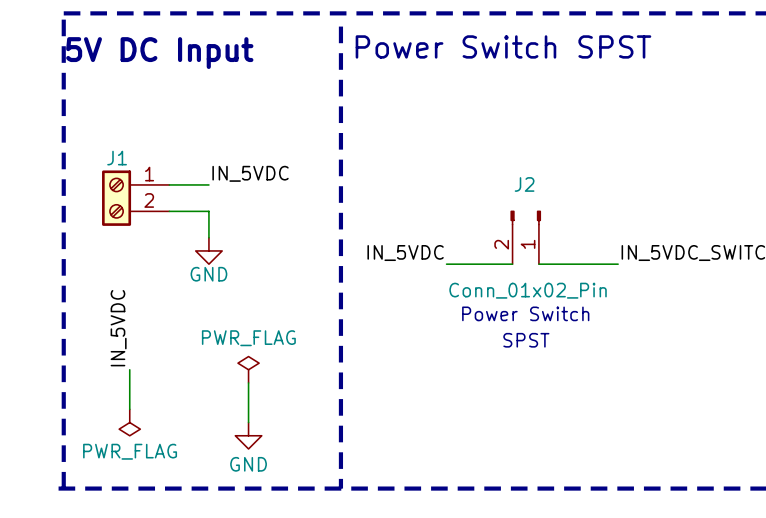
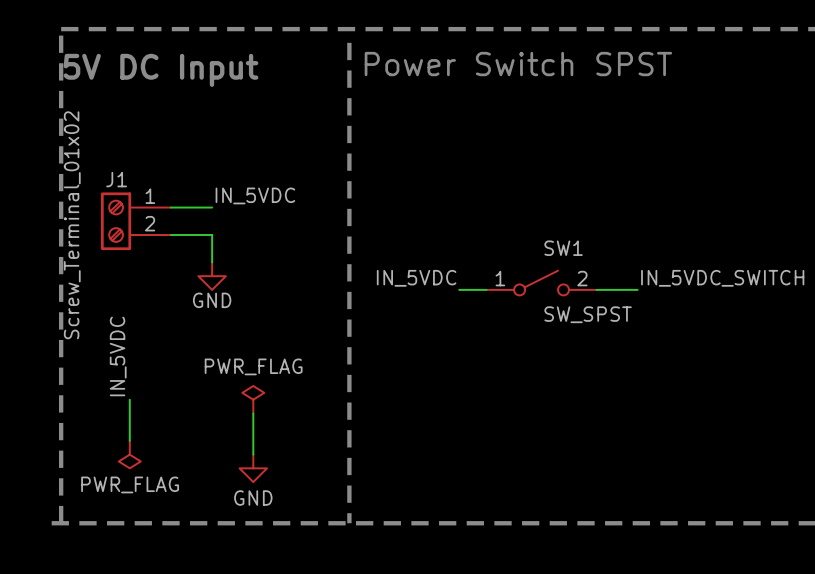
J1 value: none -> Screw_Terminal_01x02 (72, 225)
J2: Conn_01x02_Pin (525, 237) -> none
SW1: none -> SW_SPST (541, 283)
text: Power Switch (525, 313) -> none
text: SPST (526, 340) -> none

